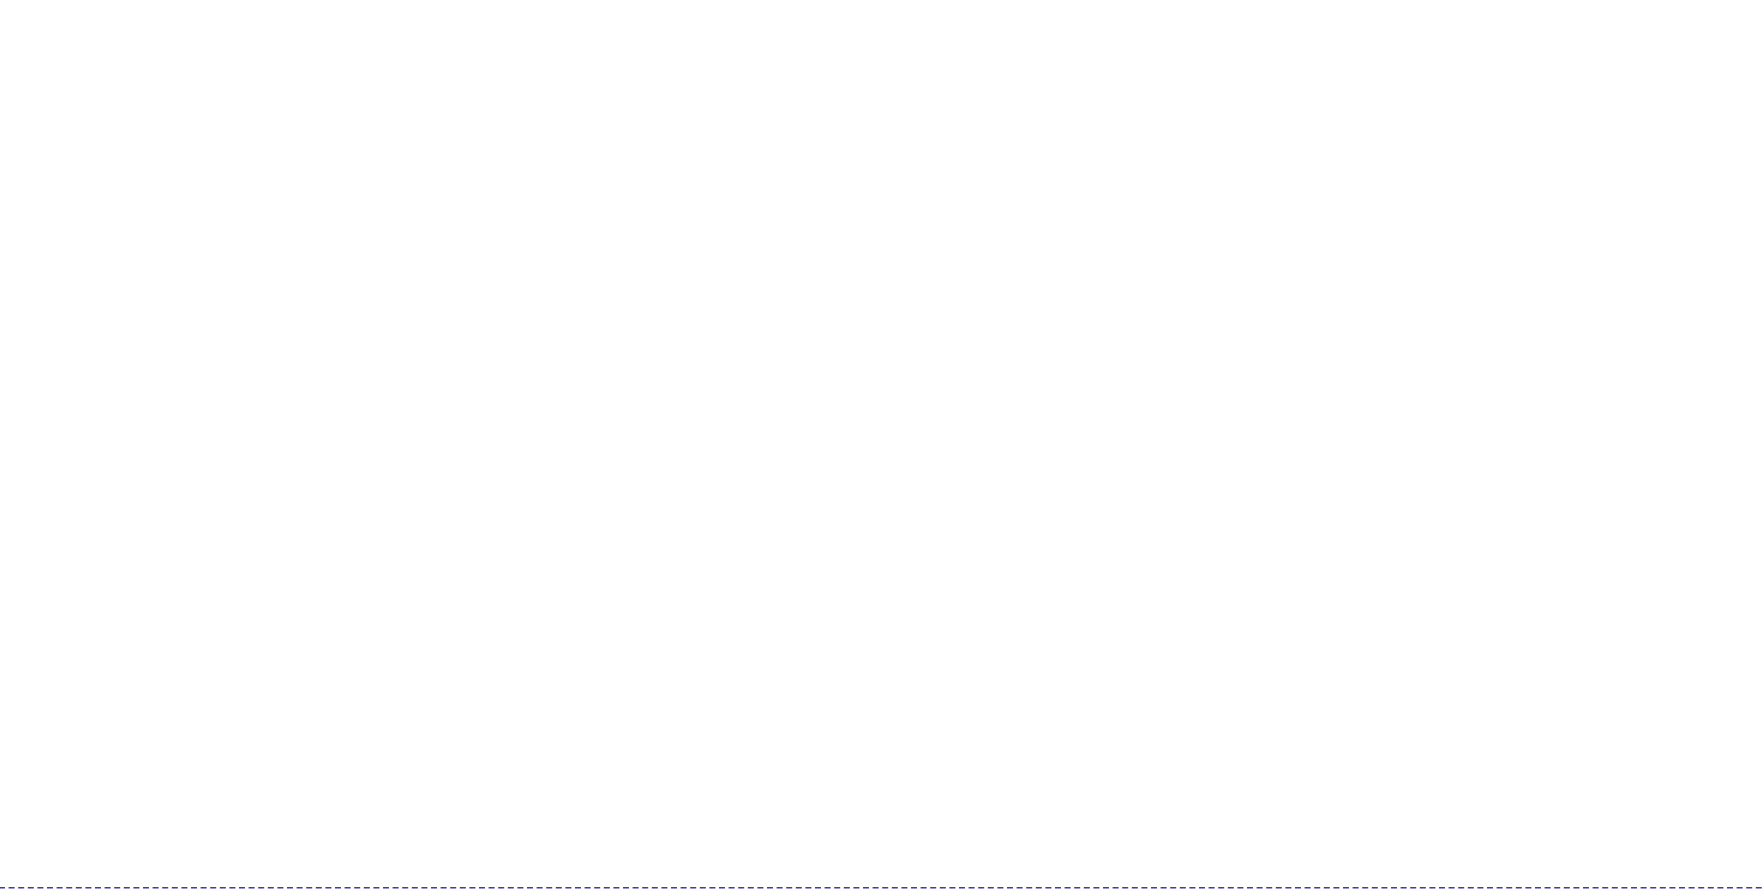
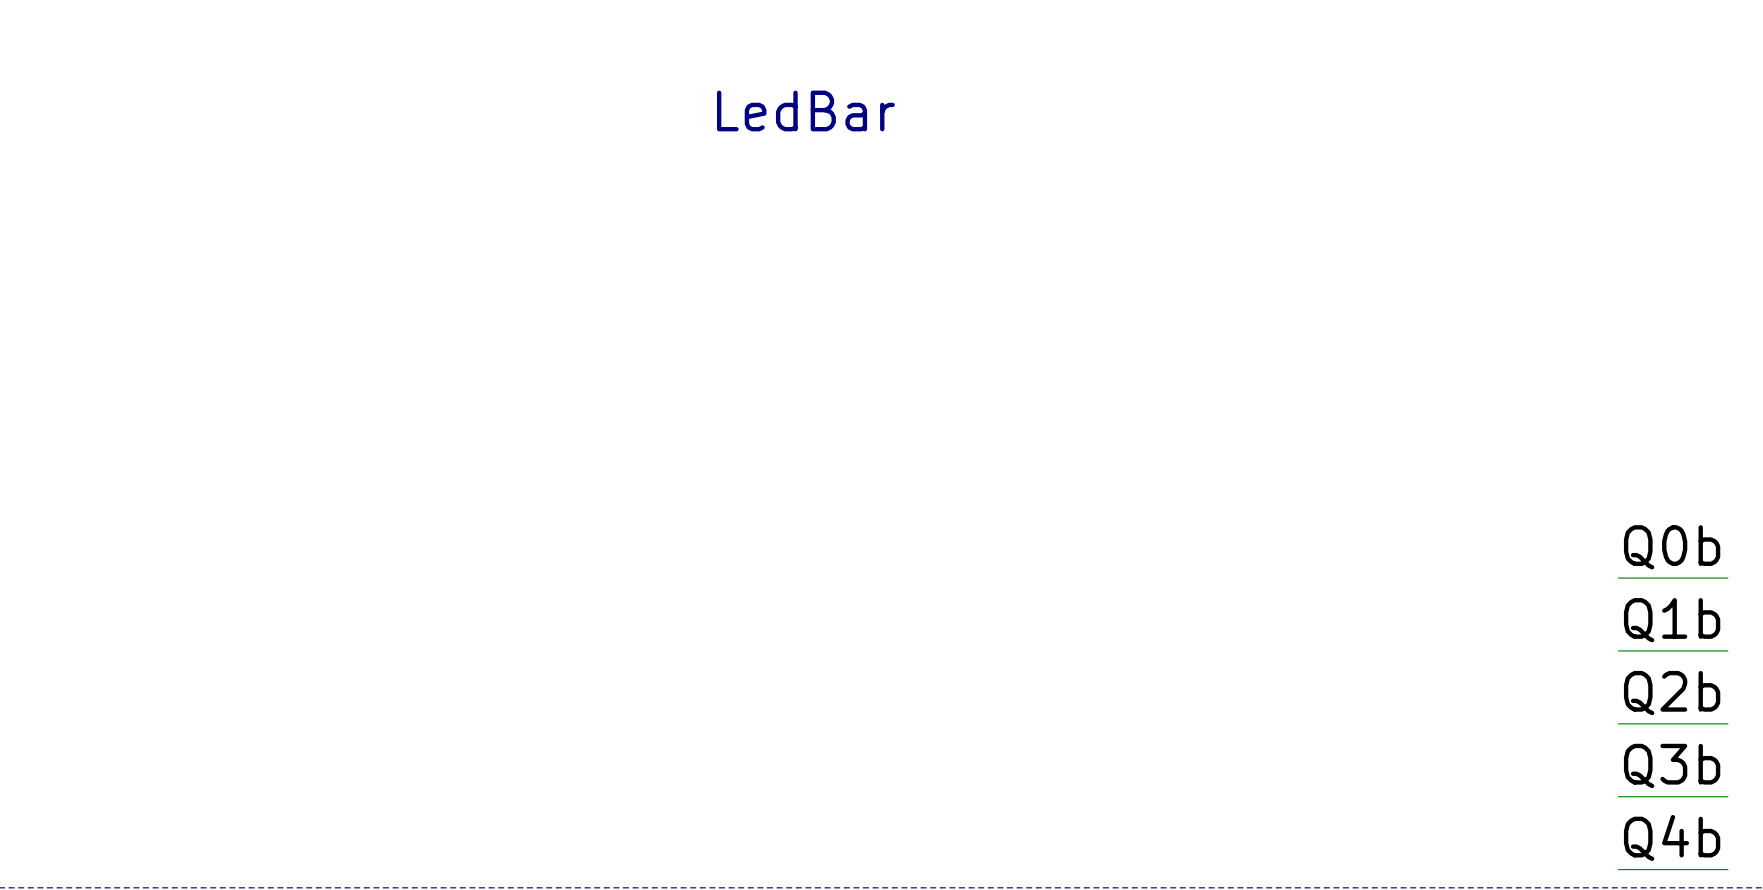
text: none -> LedBar (805, 110)
label: none -> Q0b (1672, 547)
wire: none -> (1618, 578) (1727, 578)
label: none -> Q1b (1672, 620)
wire: none -> (1618, 650) (1727, 650)
label: none -> Q2b (1672, 693)
wire: none -> (1618, 723) (1727, 723)
label: none -> Q3b (1672, 765)
wire: none -> (1618, 796) (1727, 796)
label: none -> Q4b (1672, 837)
wire: none -> (1618, 869) (1727, 869)

